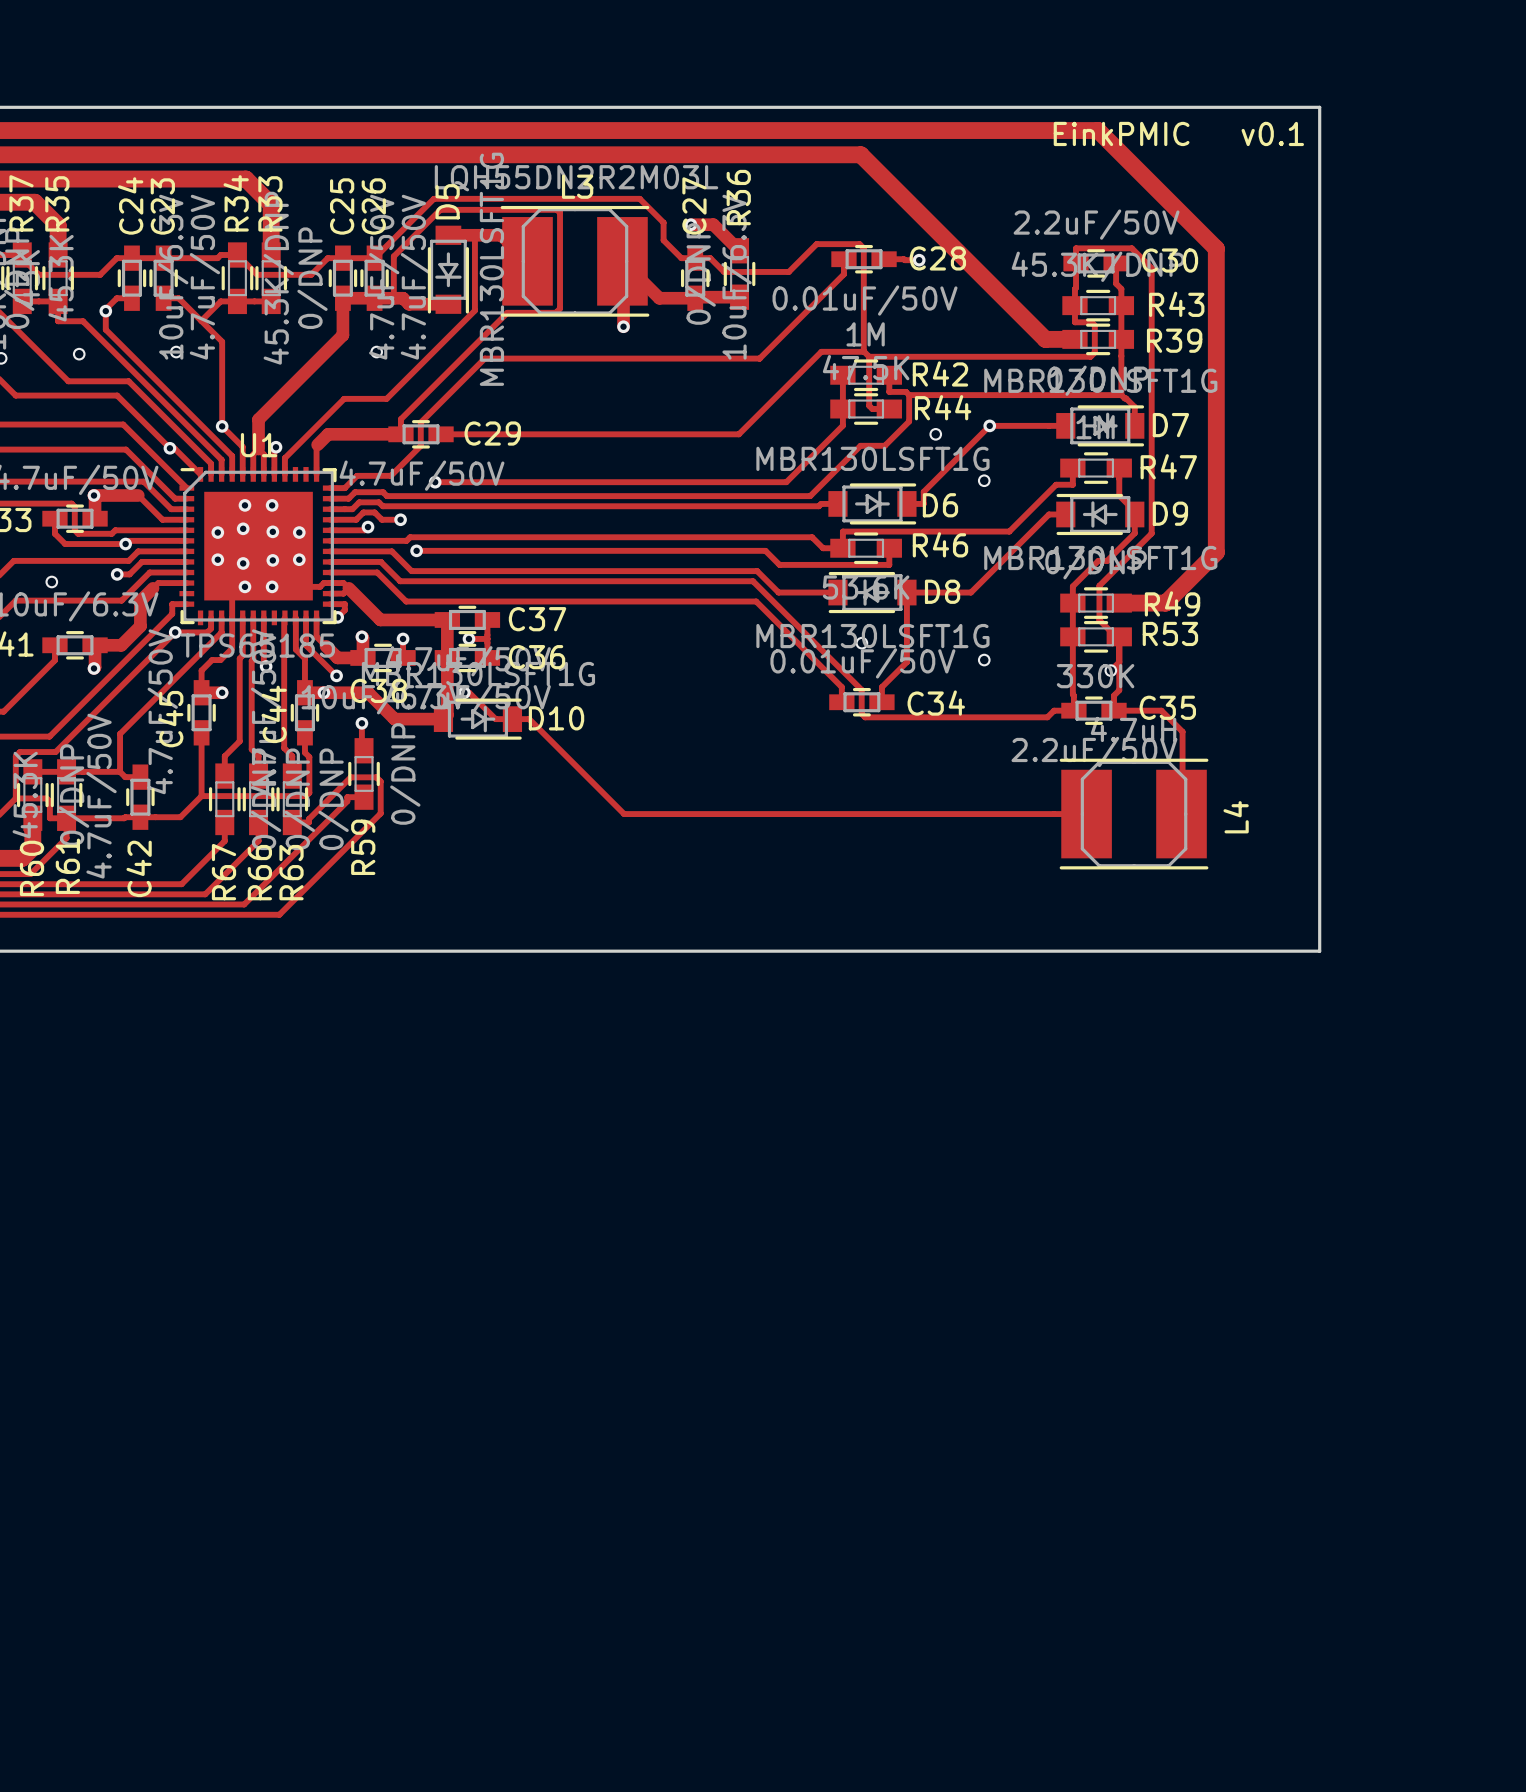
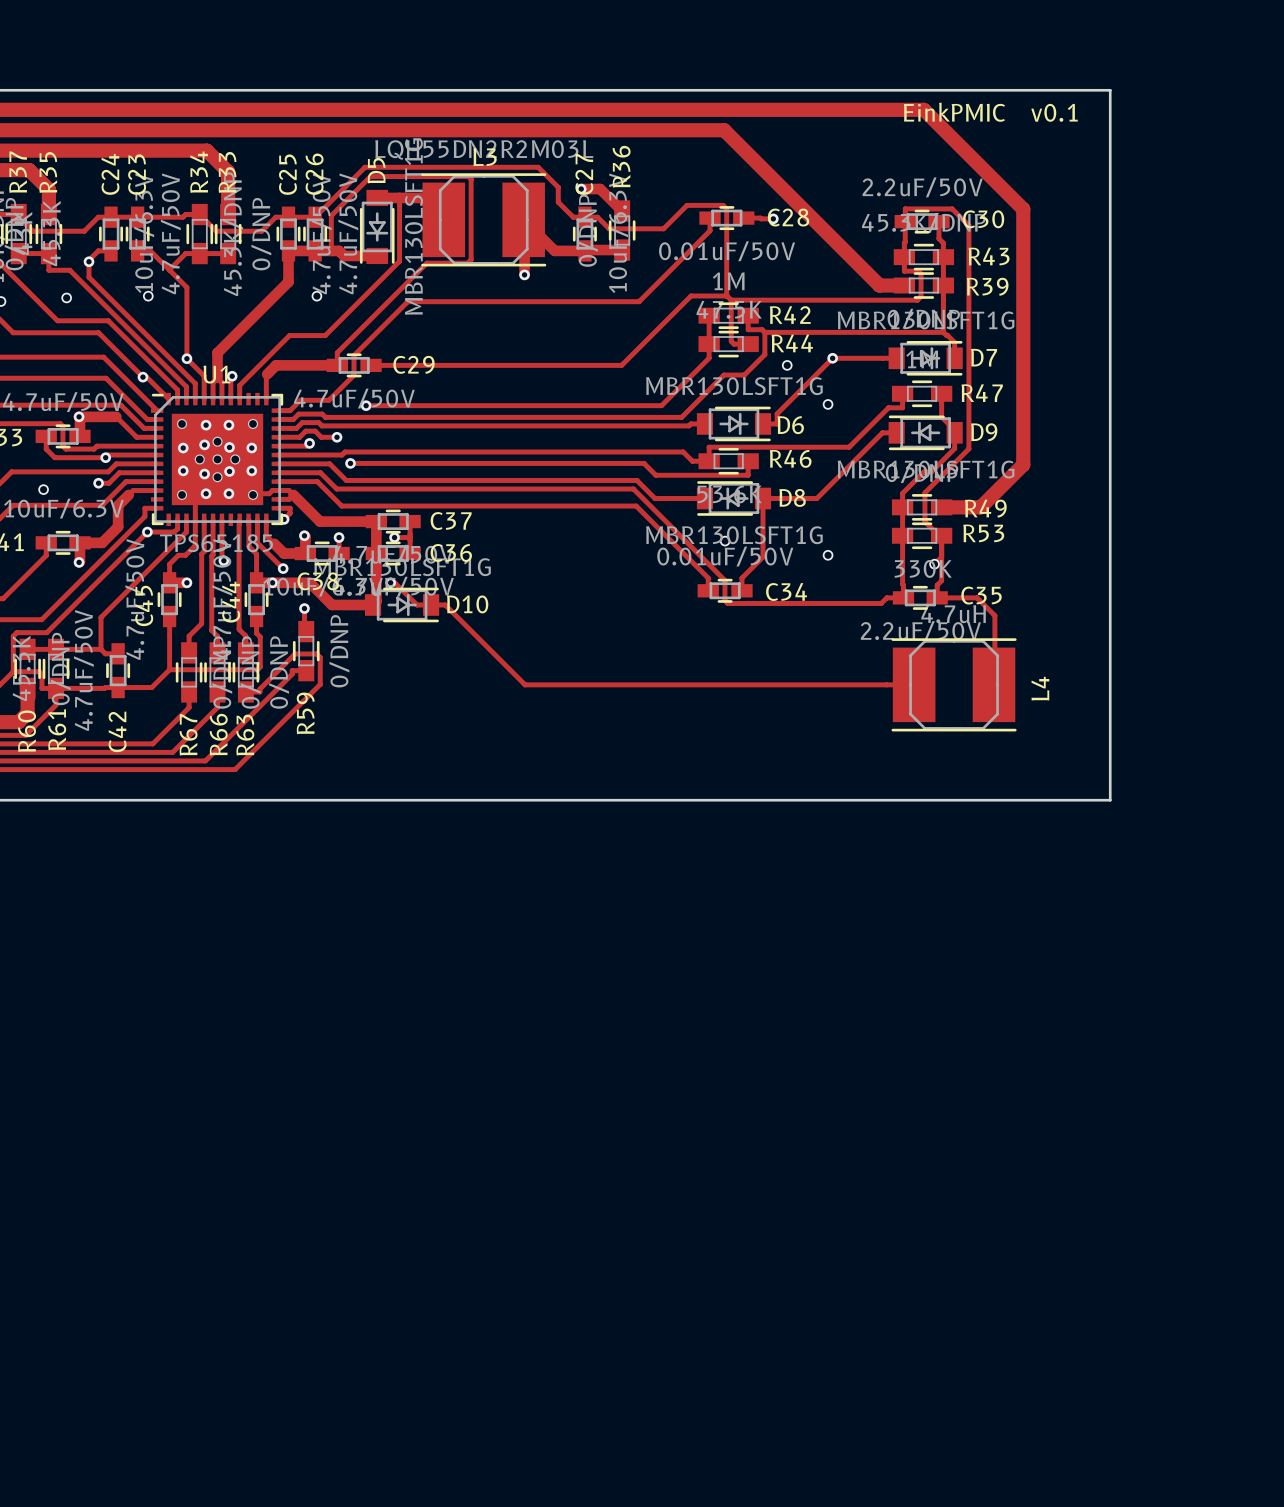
part: none -> (217, 459)

